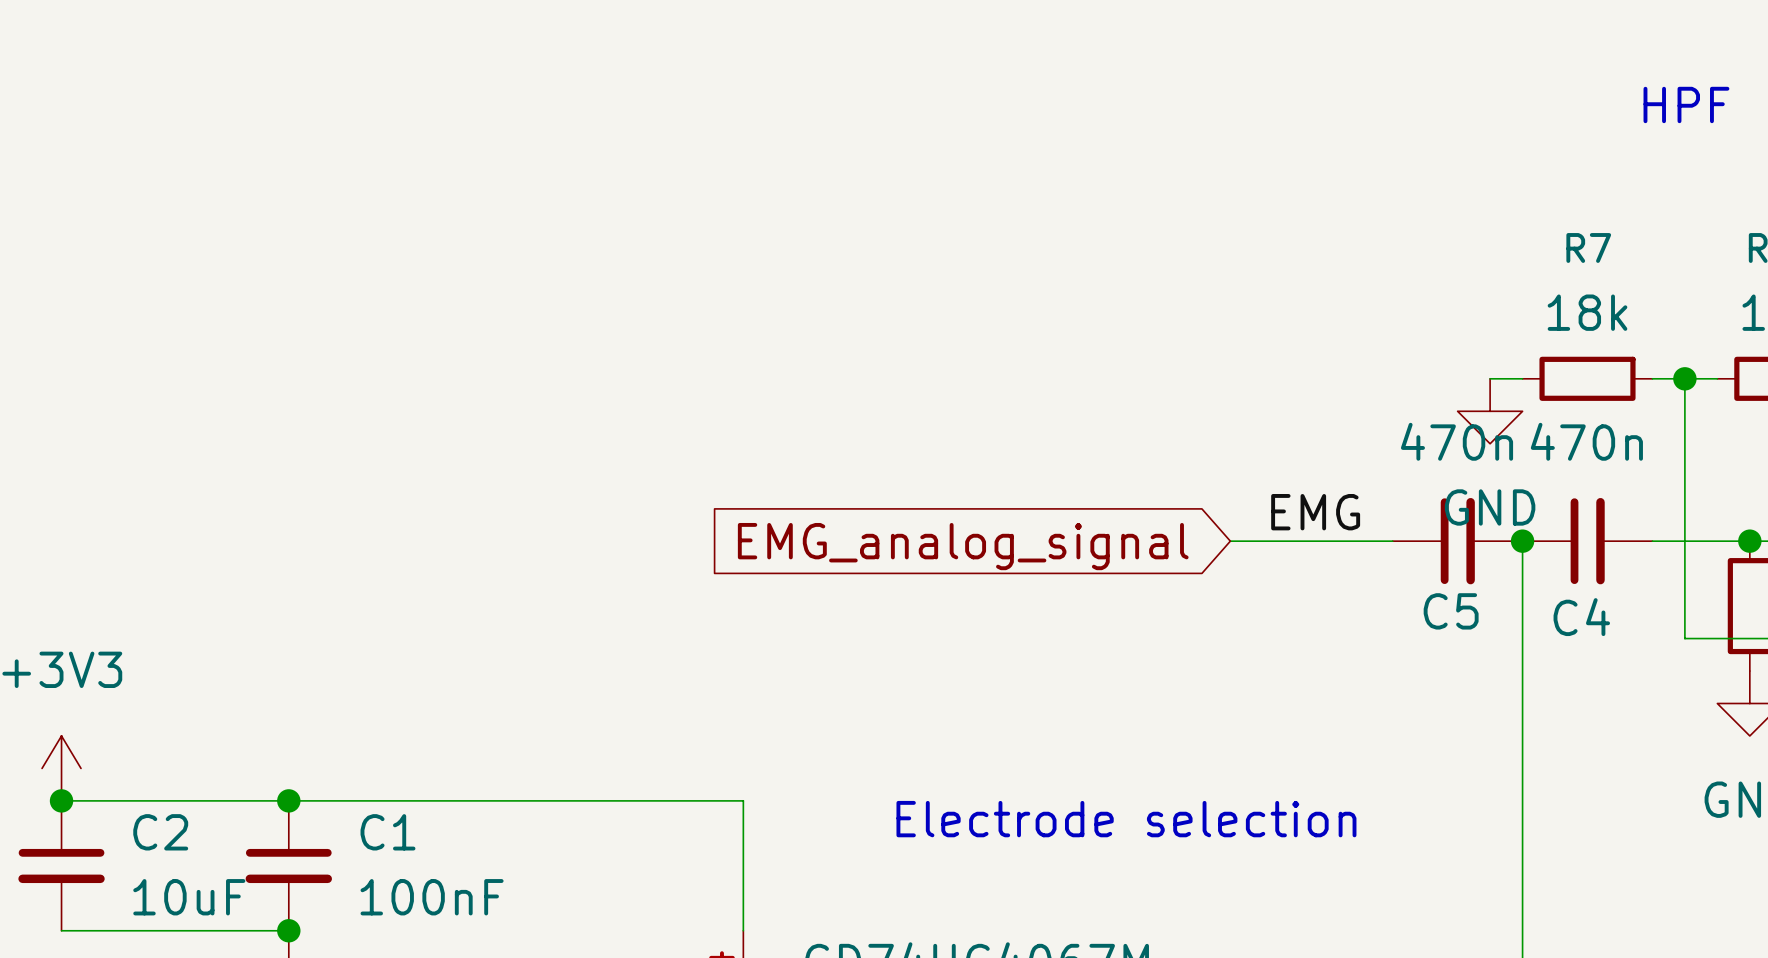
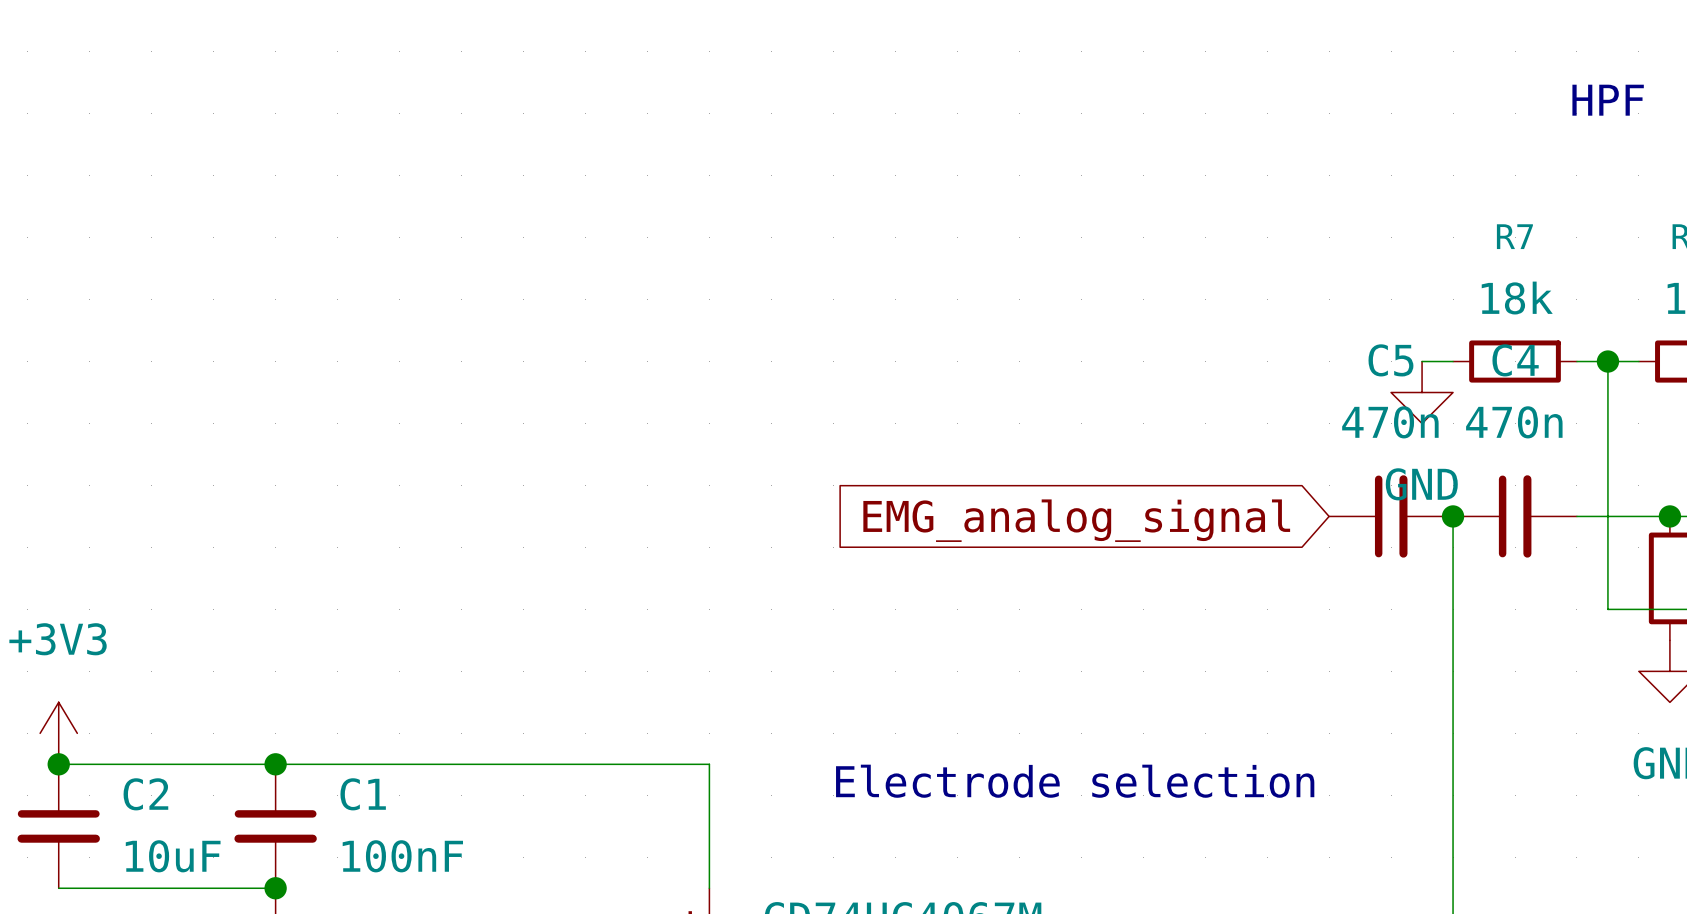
label: EMG (1315, 512) -> none
wire: (1230, 541) (1392, 541) -> none
global label position: EMG_analog_signal (963, 546) -> EMG_analog_signal (1076, 520)
C5 name position: C5 (1451, 611) -> C5 (1390, 360)
C4 name position: C4 (1581, 617) -> C4 (1515, 360)

